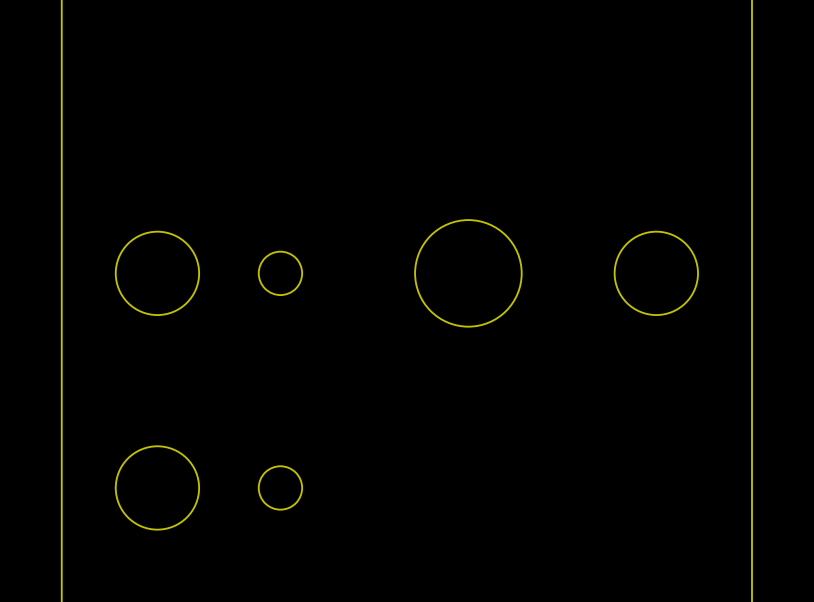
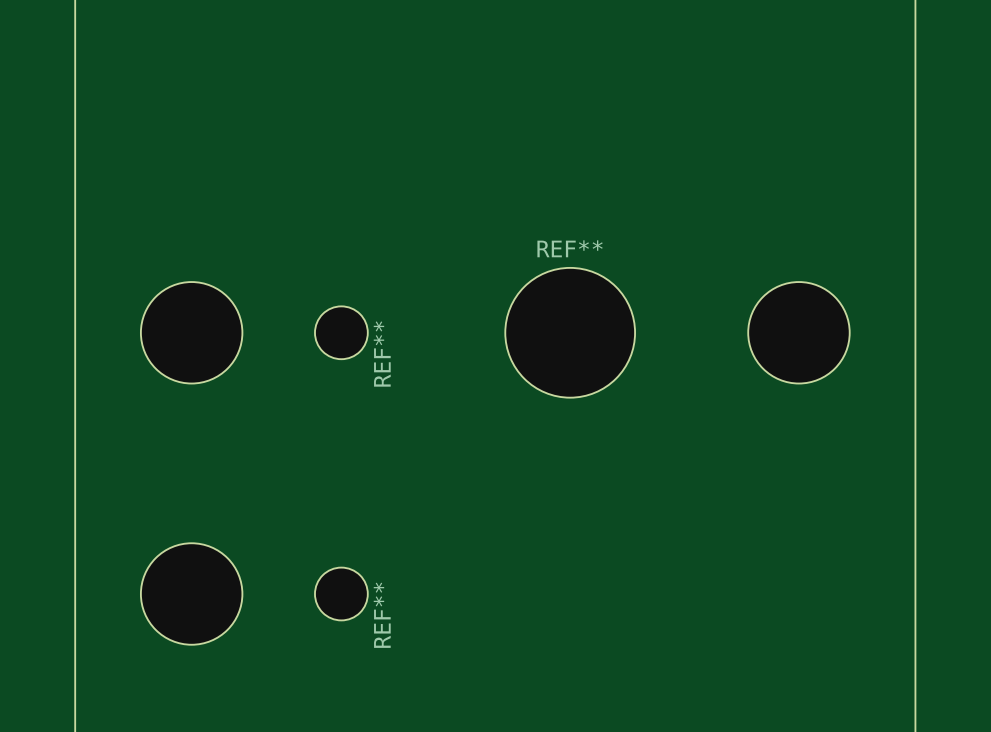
REF** name: none -> REF** (570, 248)
REF** name: none -> REF** (382, 354)
REF** name: none -> REF** (382, 615)

